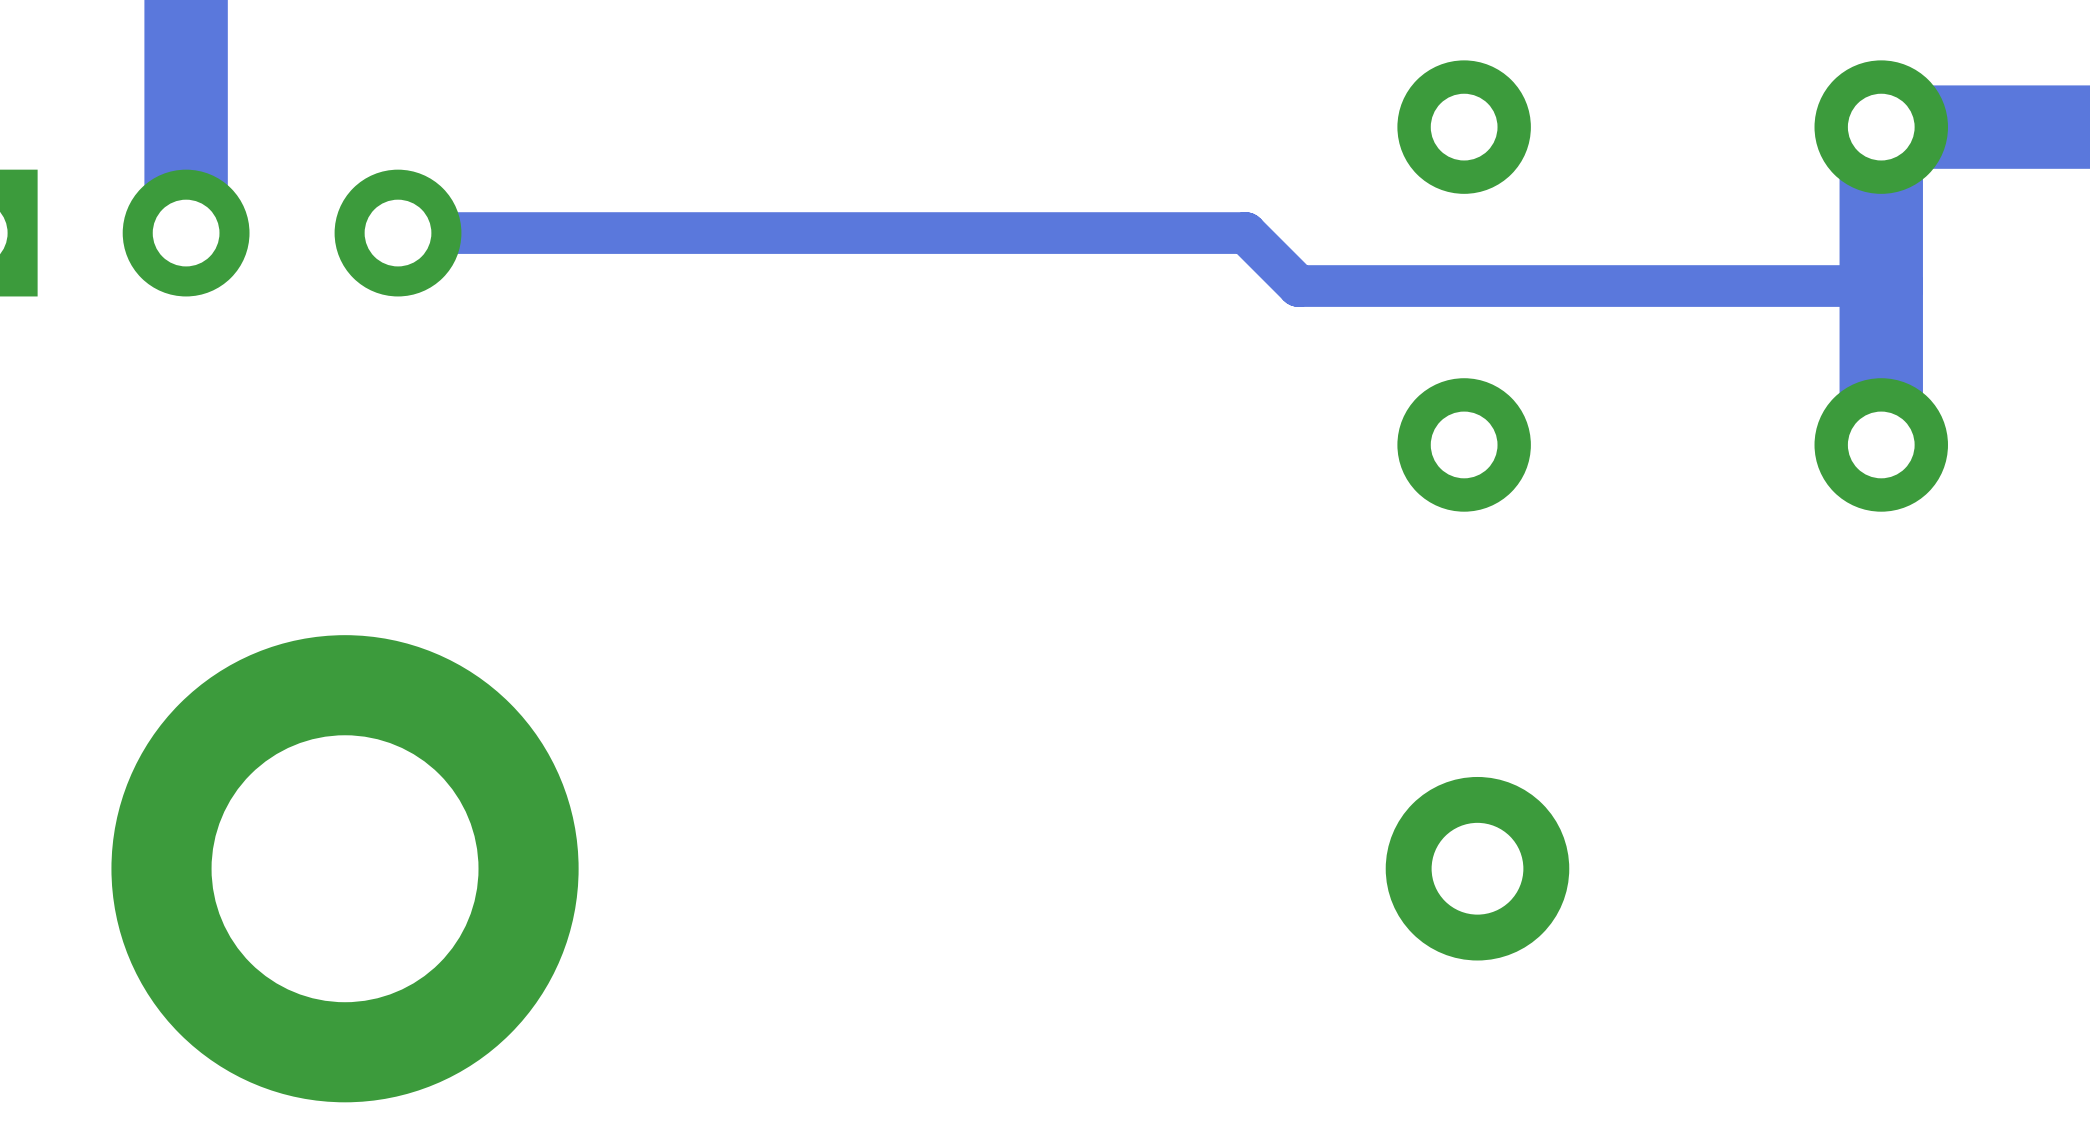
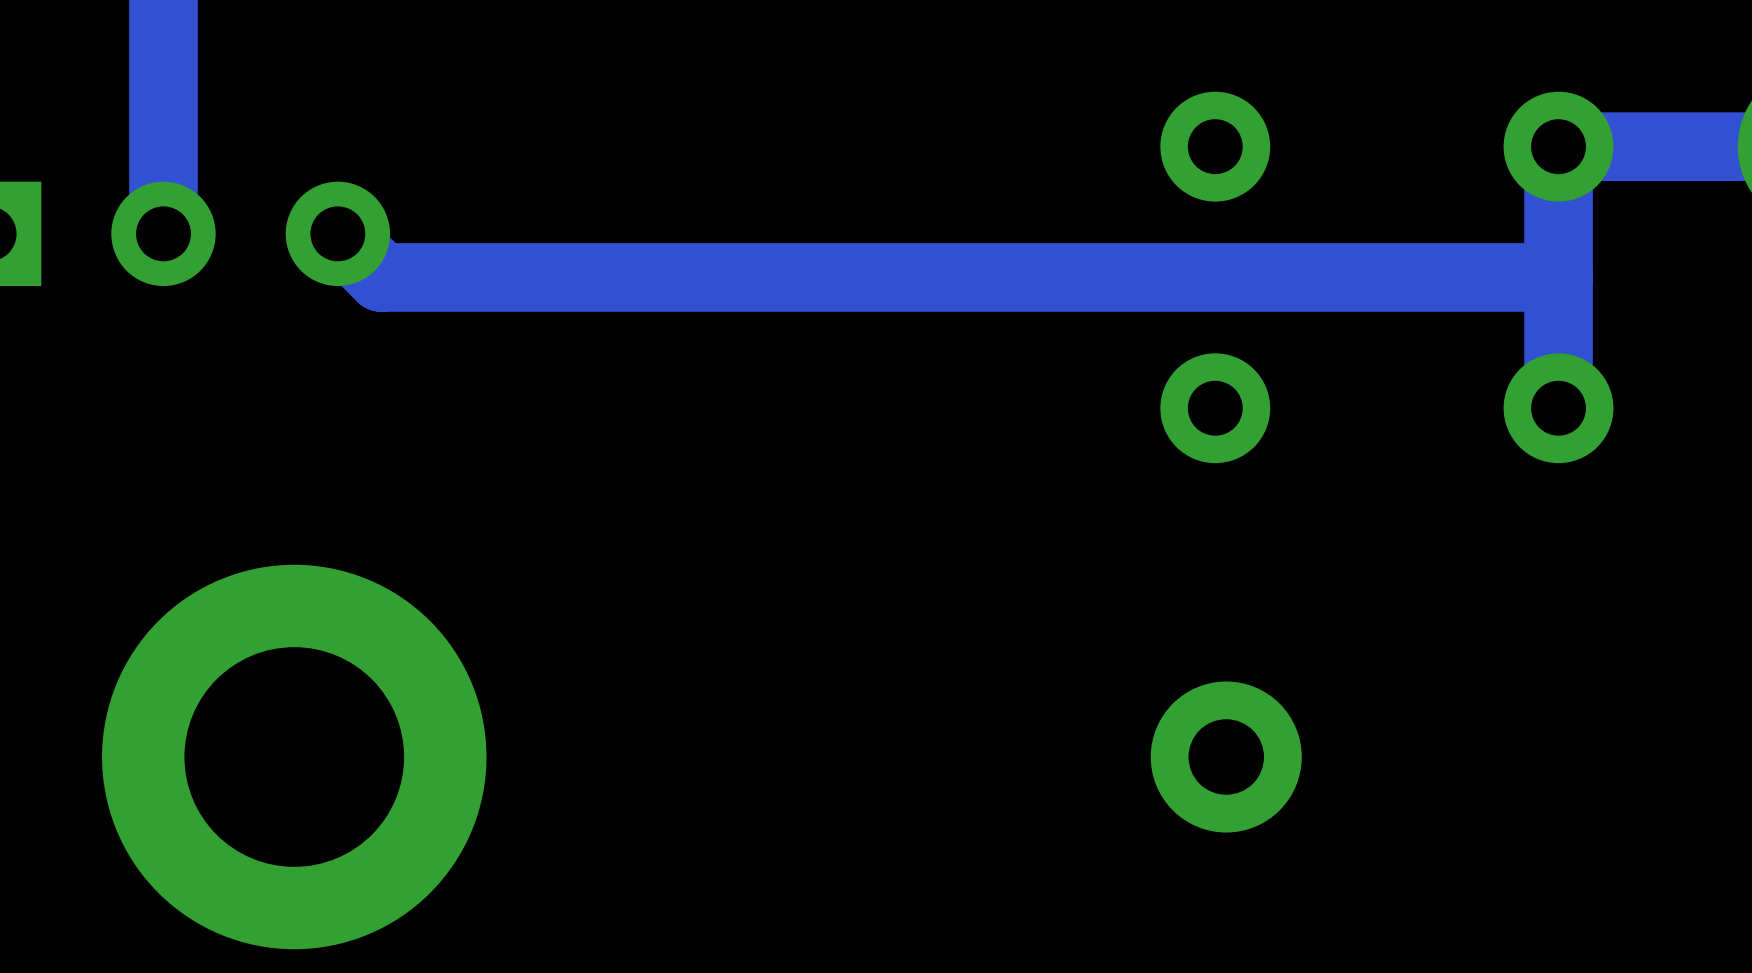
bottom track: (398, 233) (1245, 233) (1298, 286) -> (337, 233) (381, 277) (1078, 277)
bottom track width: thin (1881, 286) (1298, 286) -> thick (1558, 277) (1078, 277)

